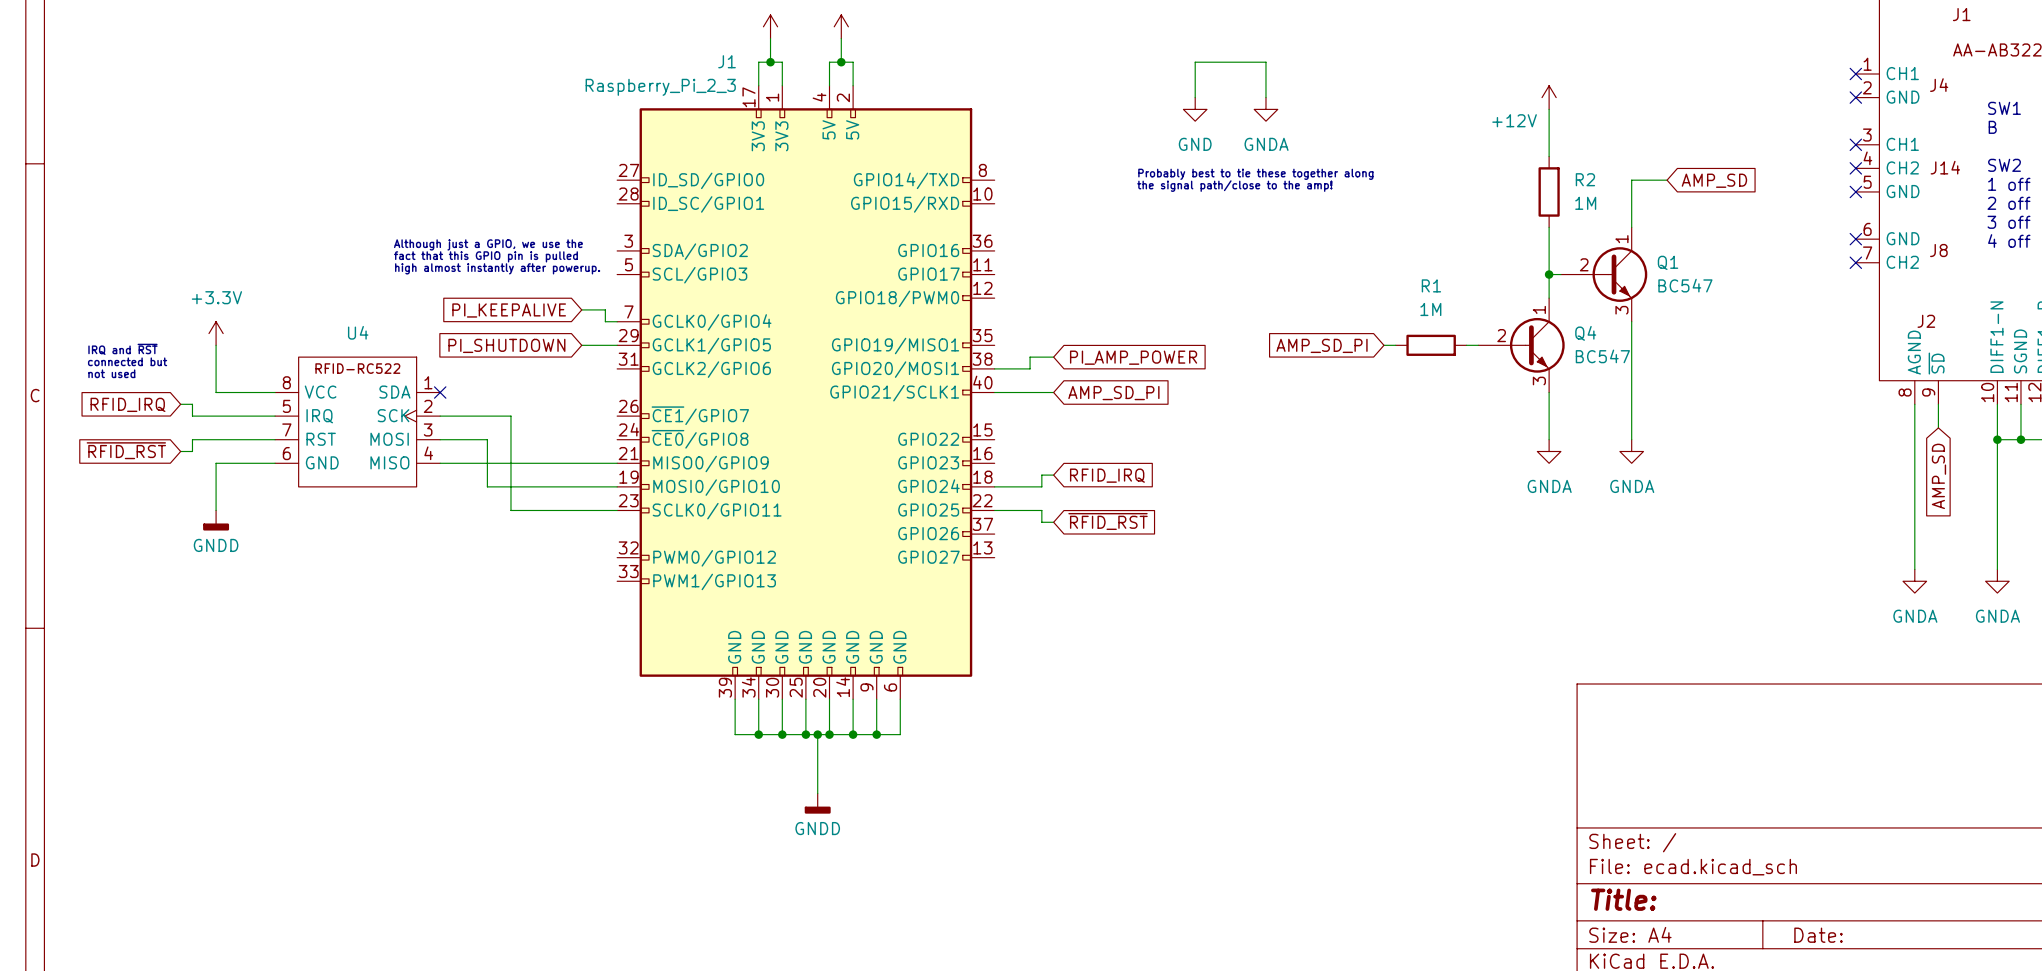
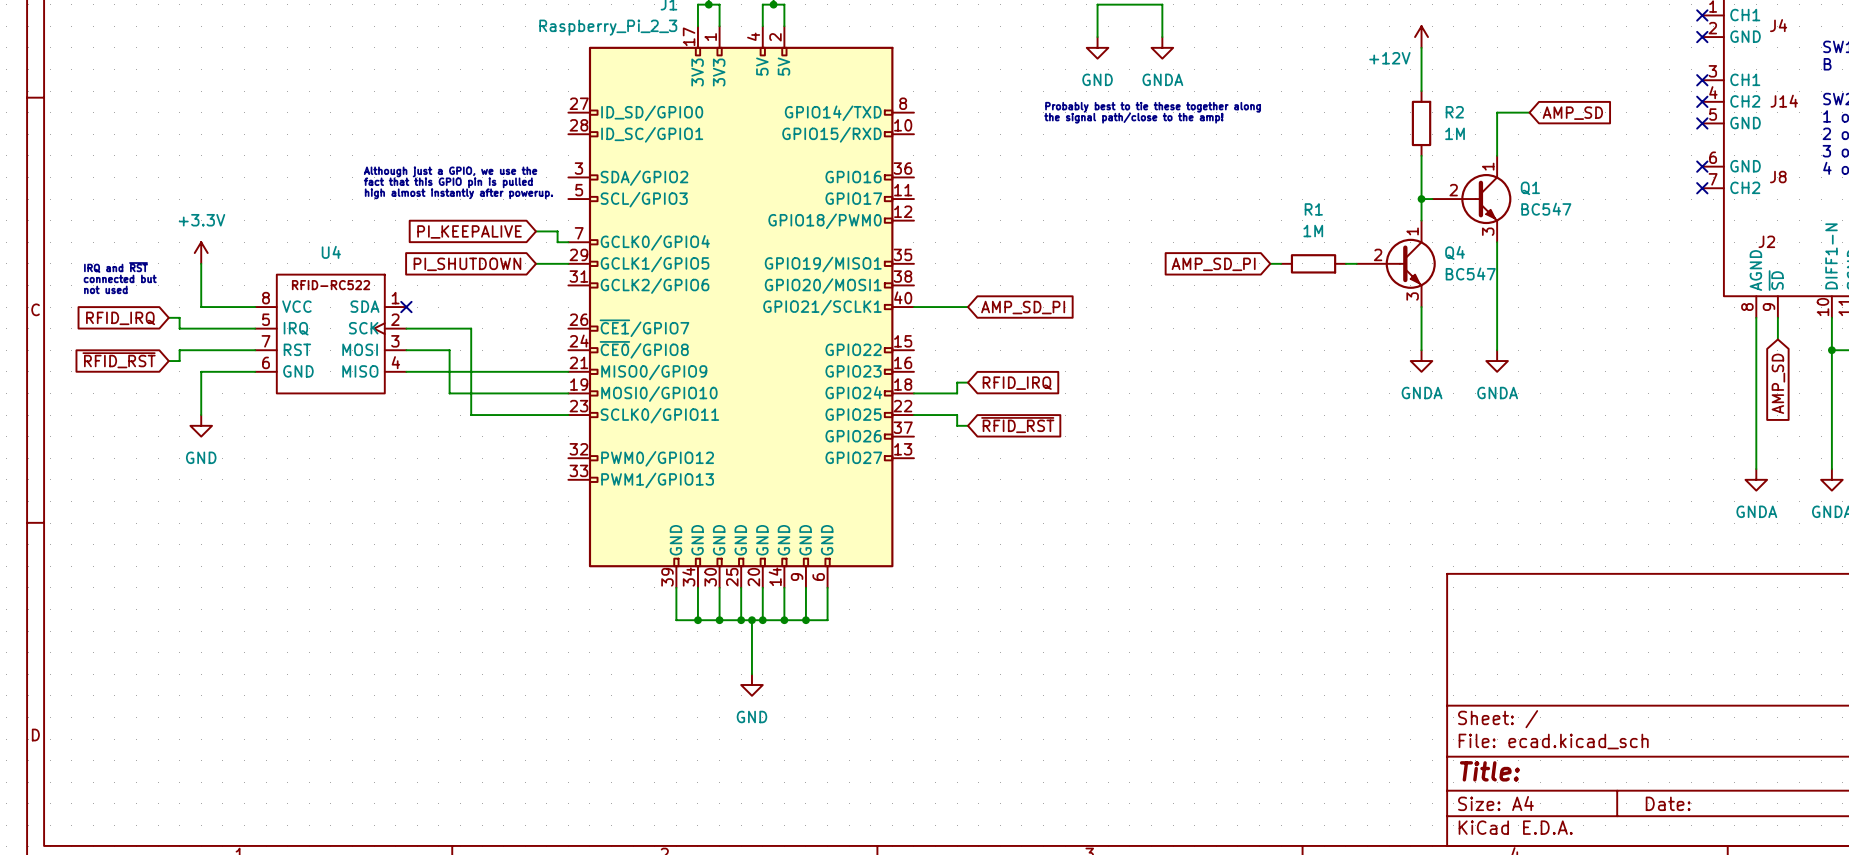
wire: (1053, 357) (1030, 357) (1030, 368) (994, 368) -> none
global label: PI_AMP_POWER (1133, 357) -> none
power symbol: GNDD (216, 520) -> GND (201, 425)
power symbol: GNDD (817, 803) -> GND (751, 685)

